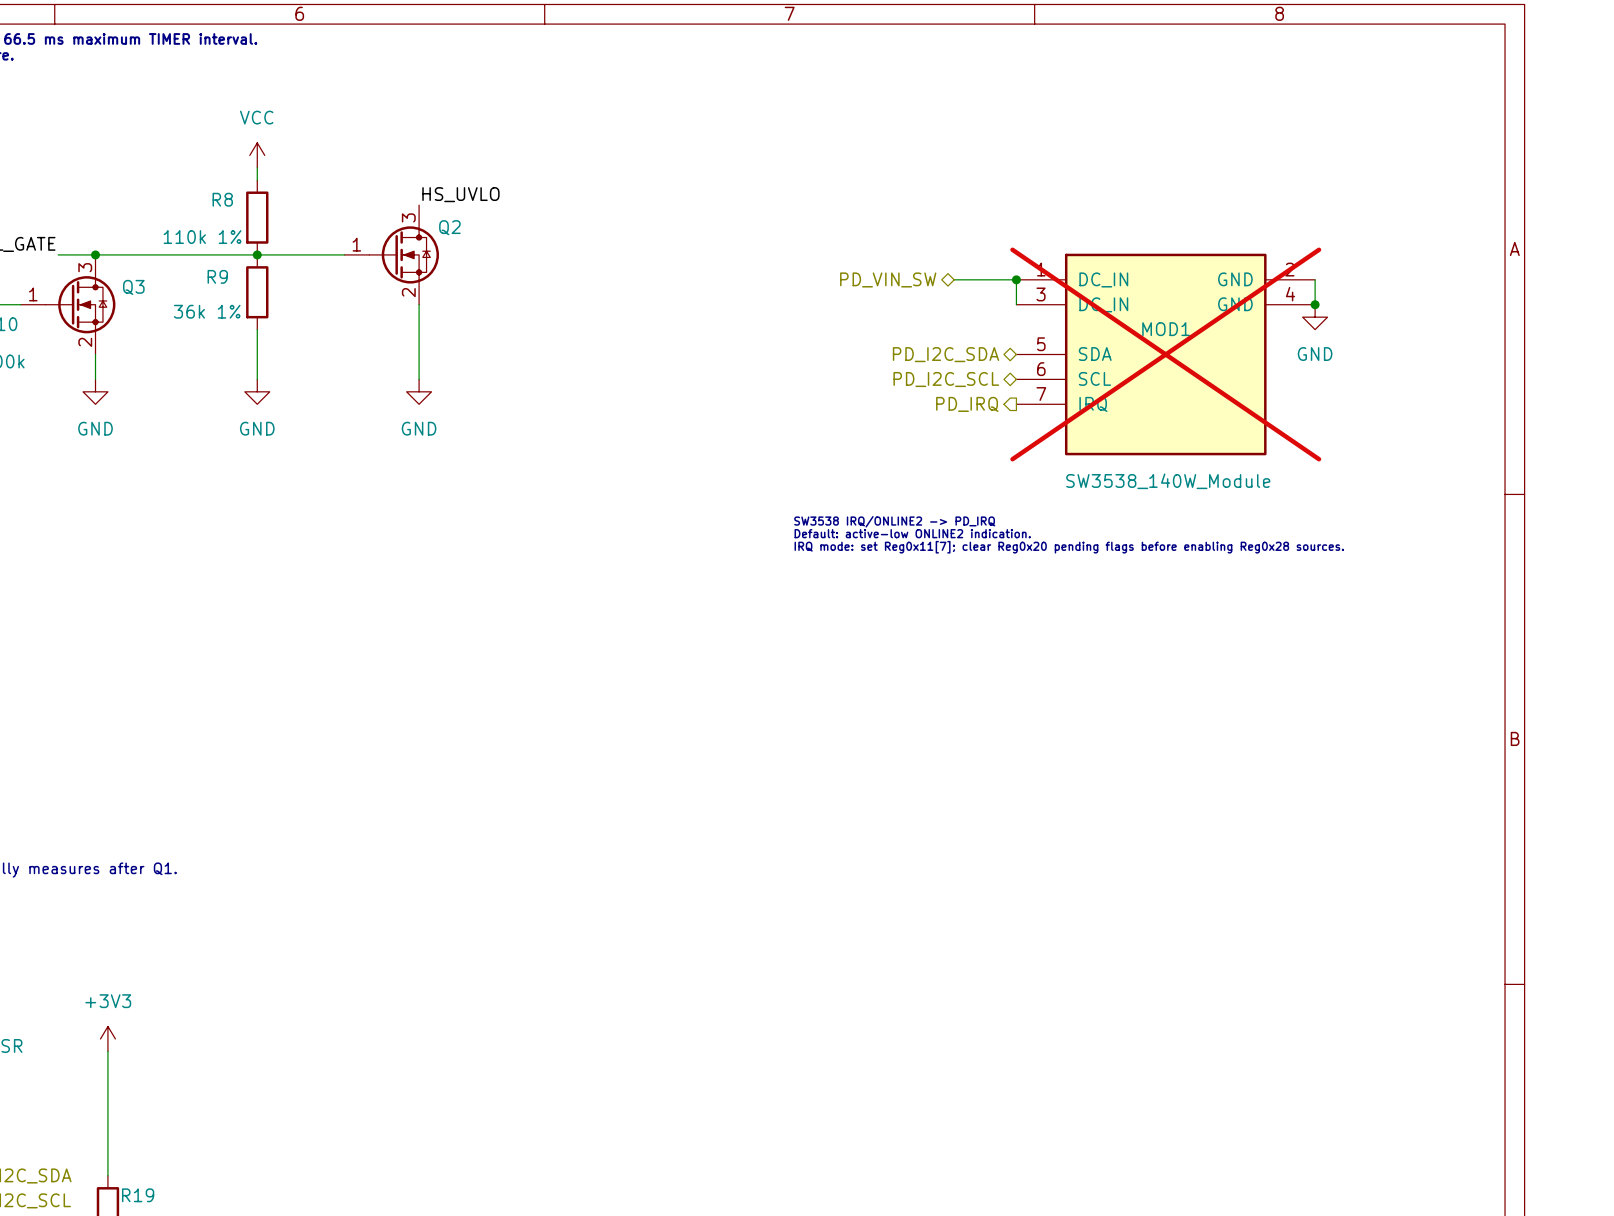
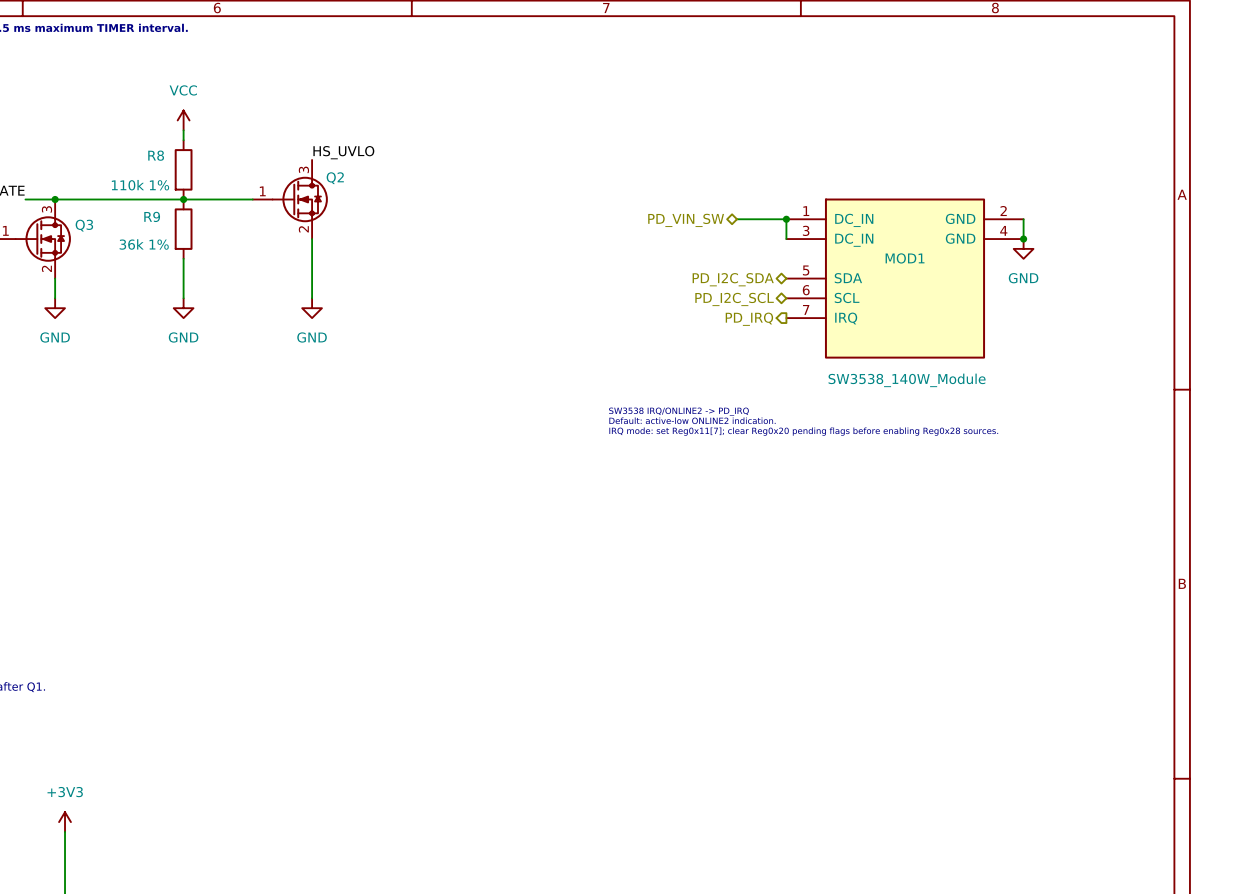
MOD1 do-not-place cross: (1165, 354) -> none

